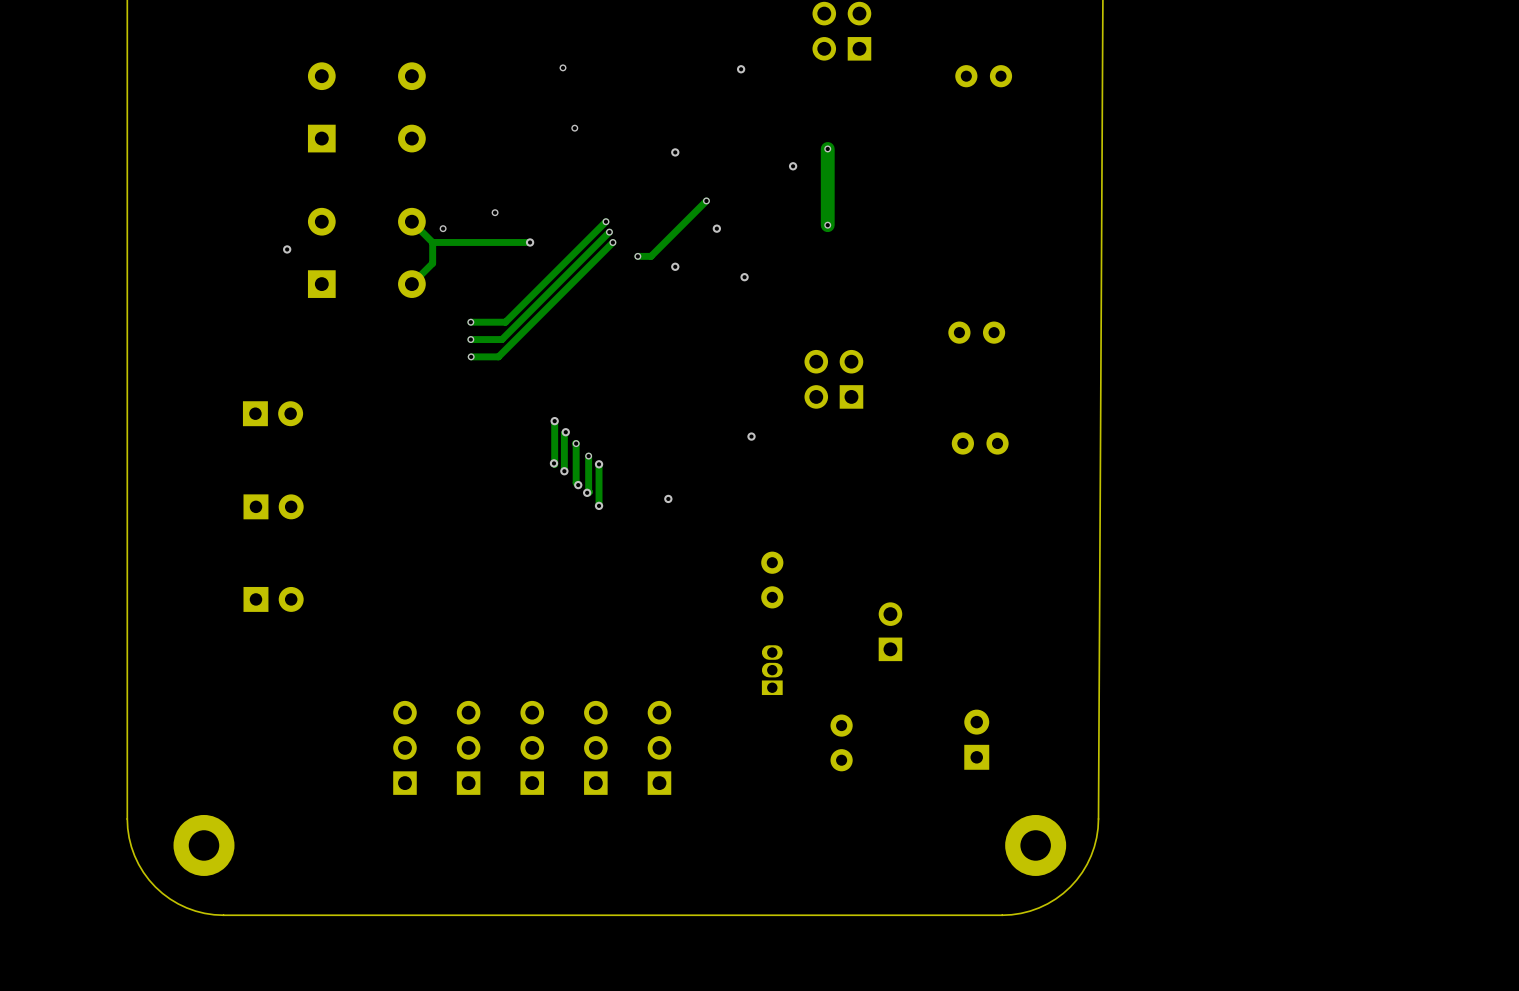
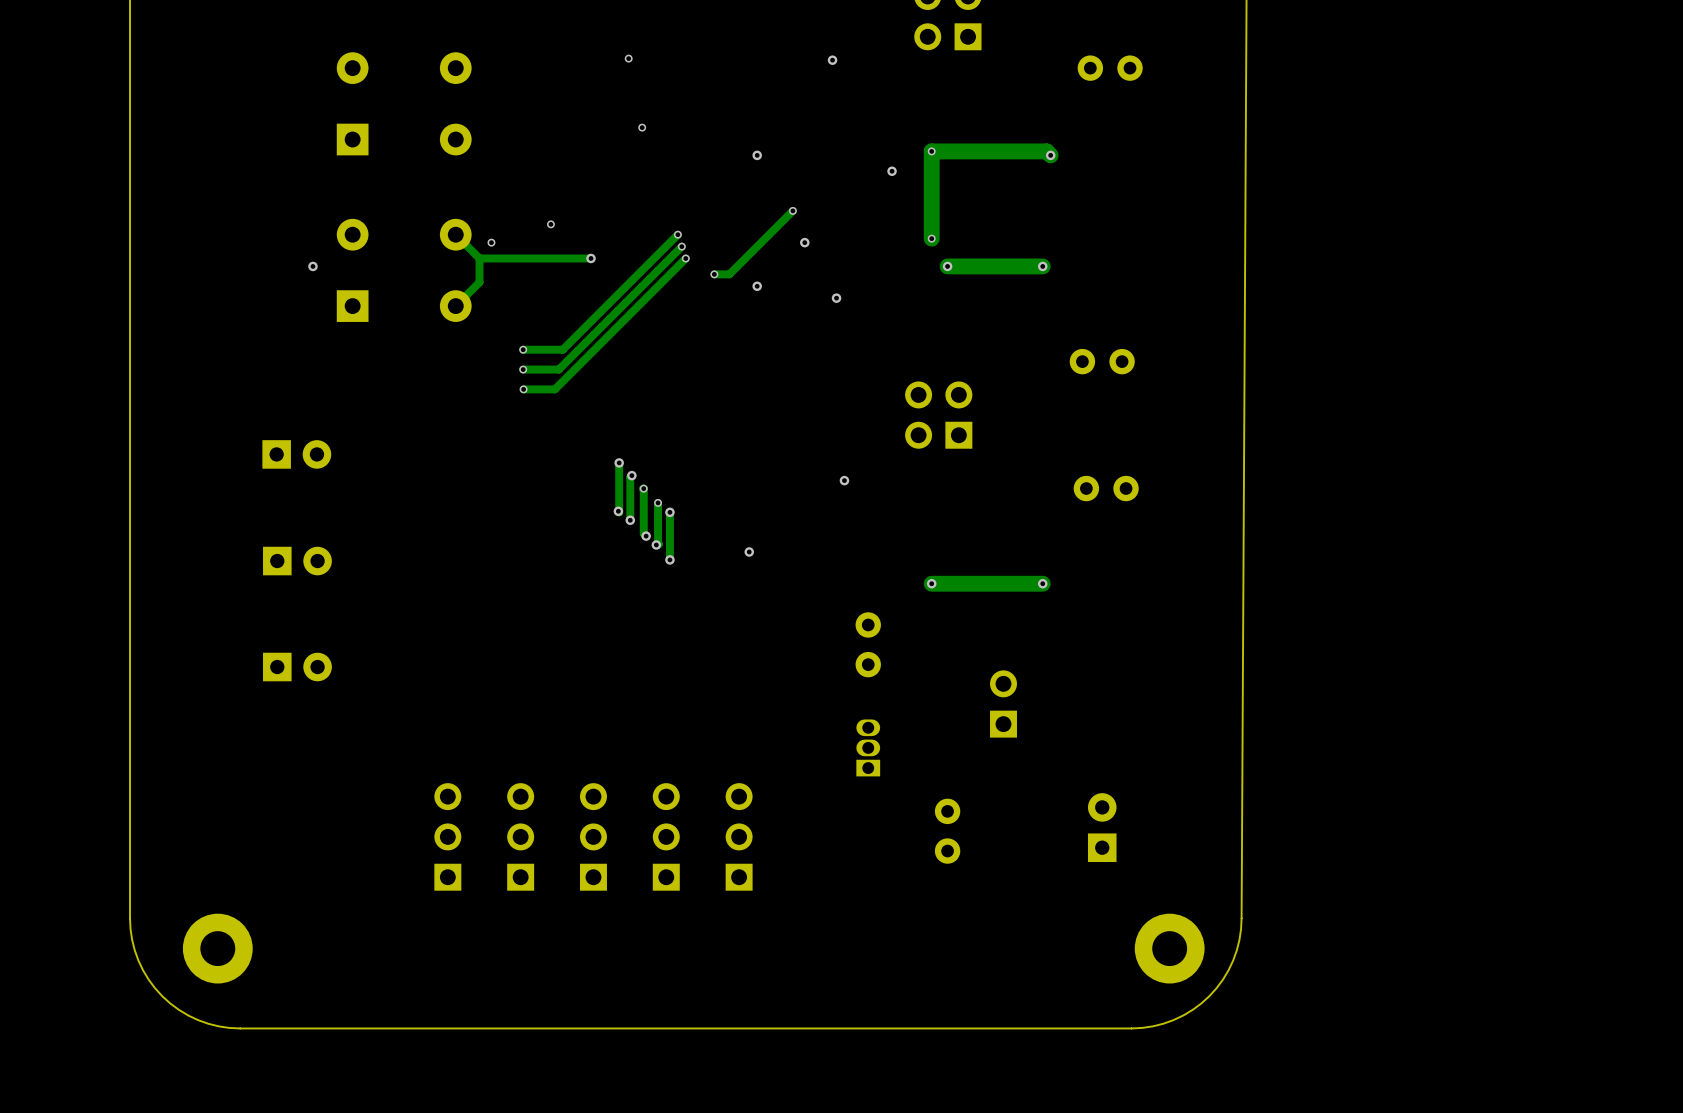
track: none -> (931, 151) (1046, 151) (1050, 155)
via: none -> (1050, 155)
via: none -> (947, 266)
track: none -> (1042, 266) (947, 266)
via: none -> (1042, 266)
via: none -> (931, 583)
track: none -> (1042, 583) (931, 583)
via: none -> (1042, 583)

